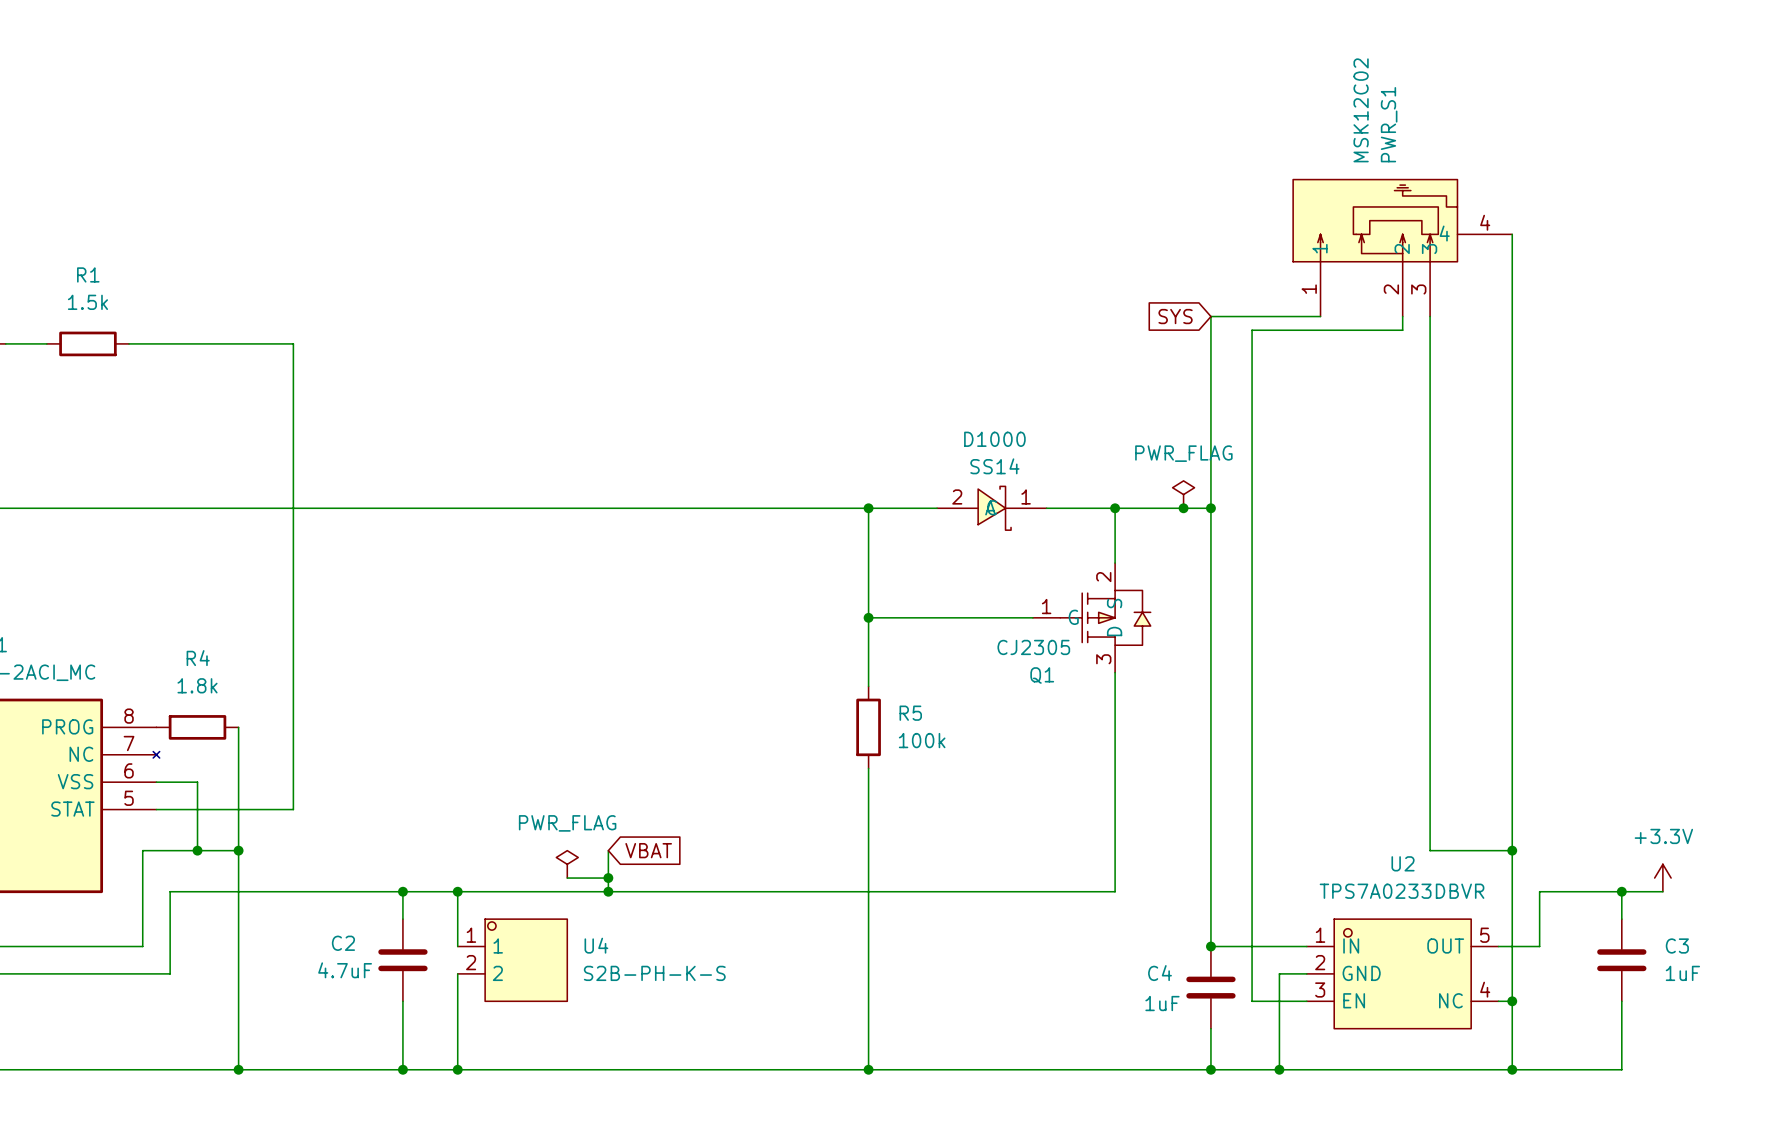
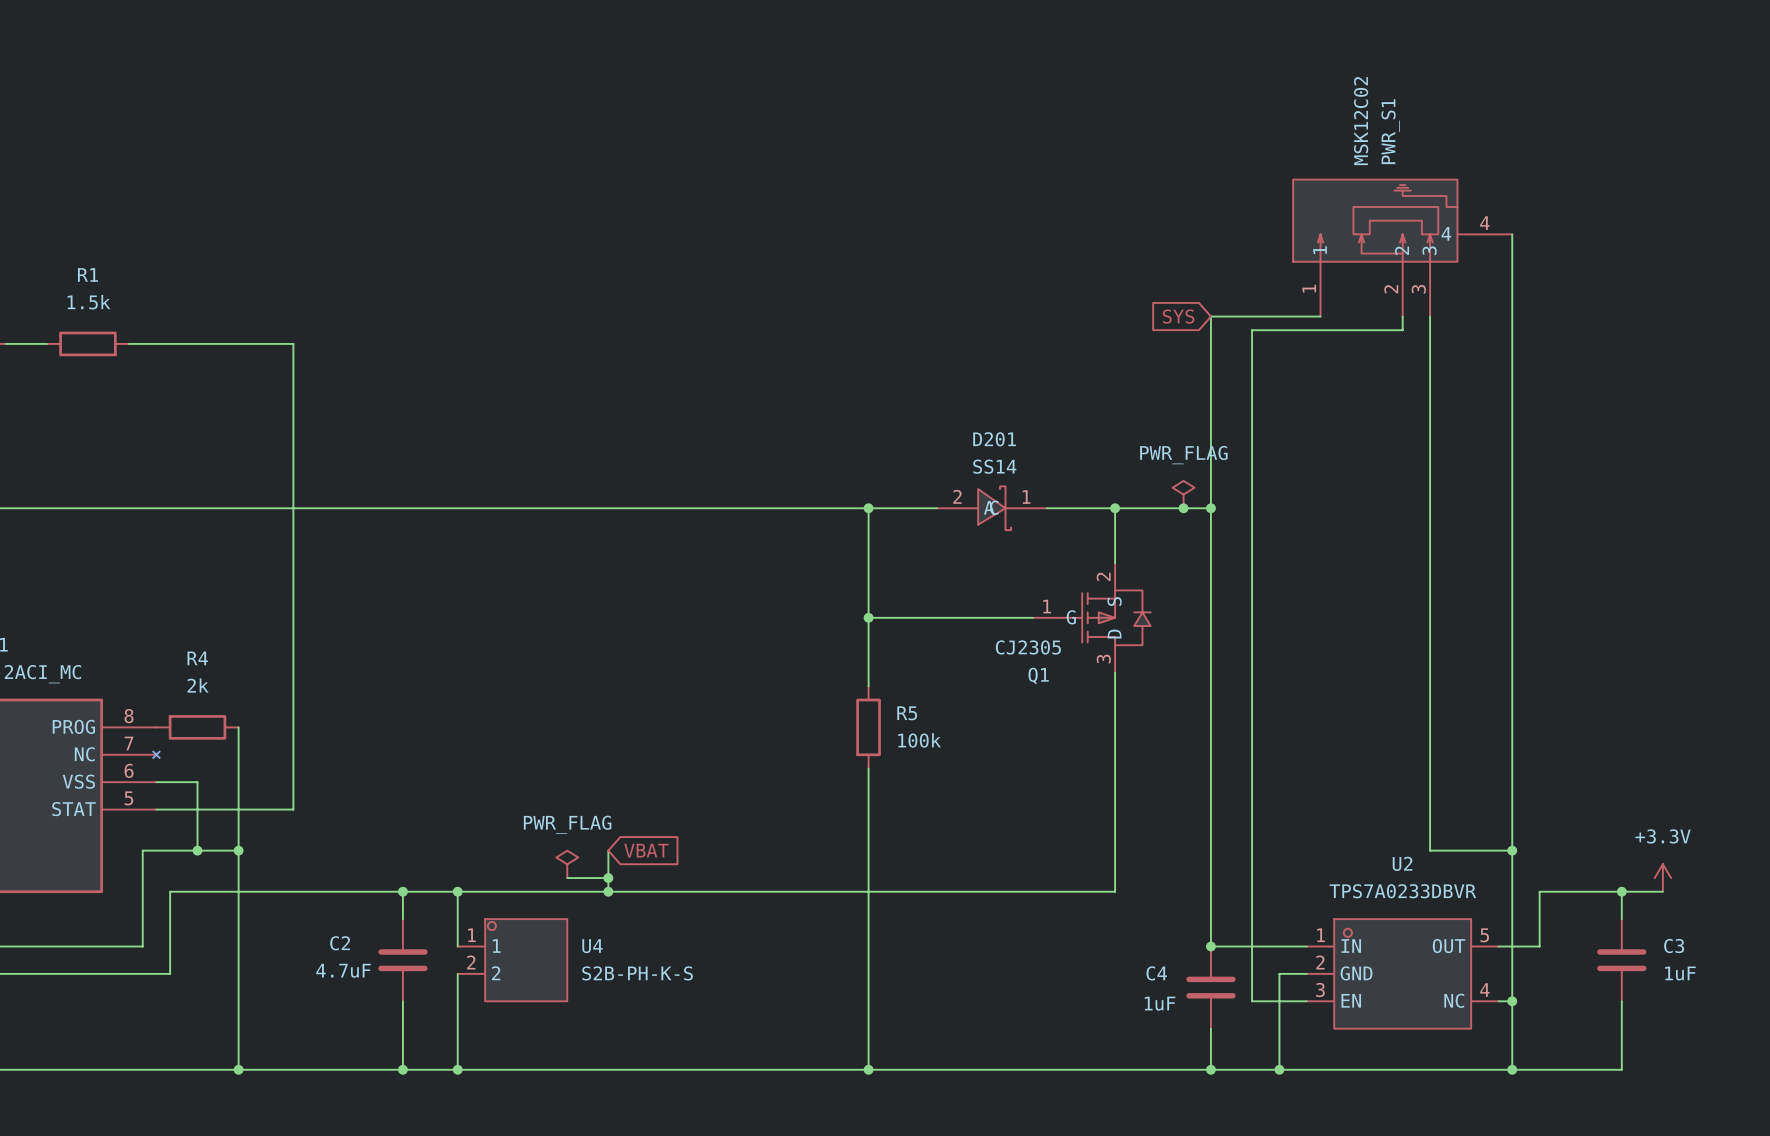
D1000 name: D1000 (994, 439) -> D201 (994, 439)
R4 value: 1.8k (197, 685) -> 2k (198, 685)

